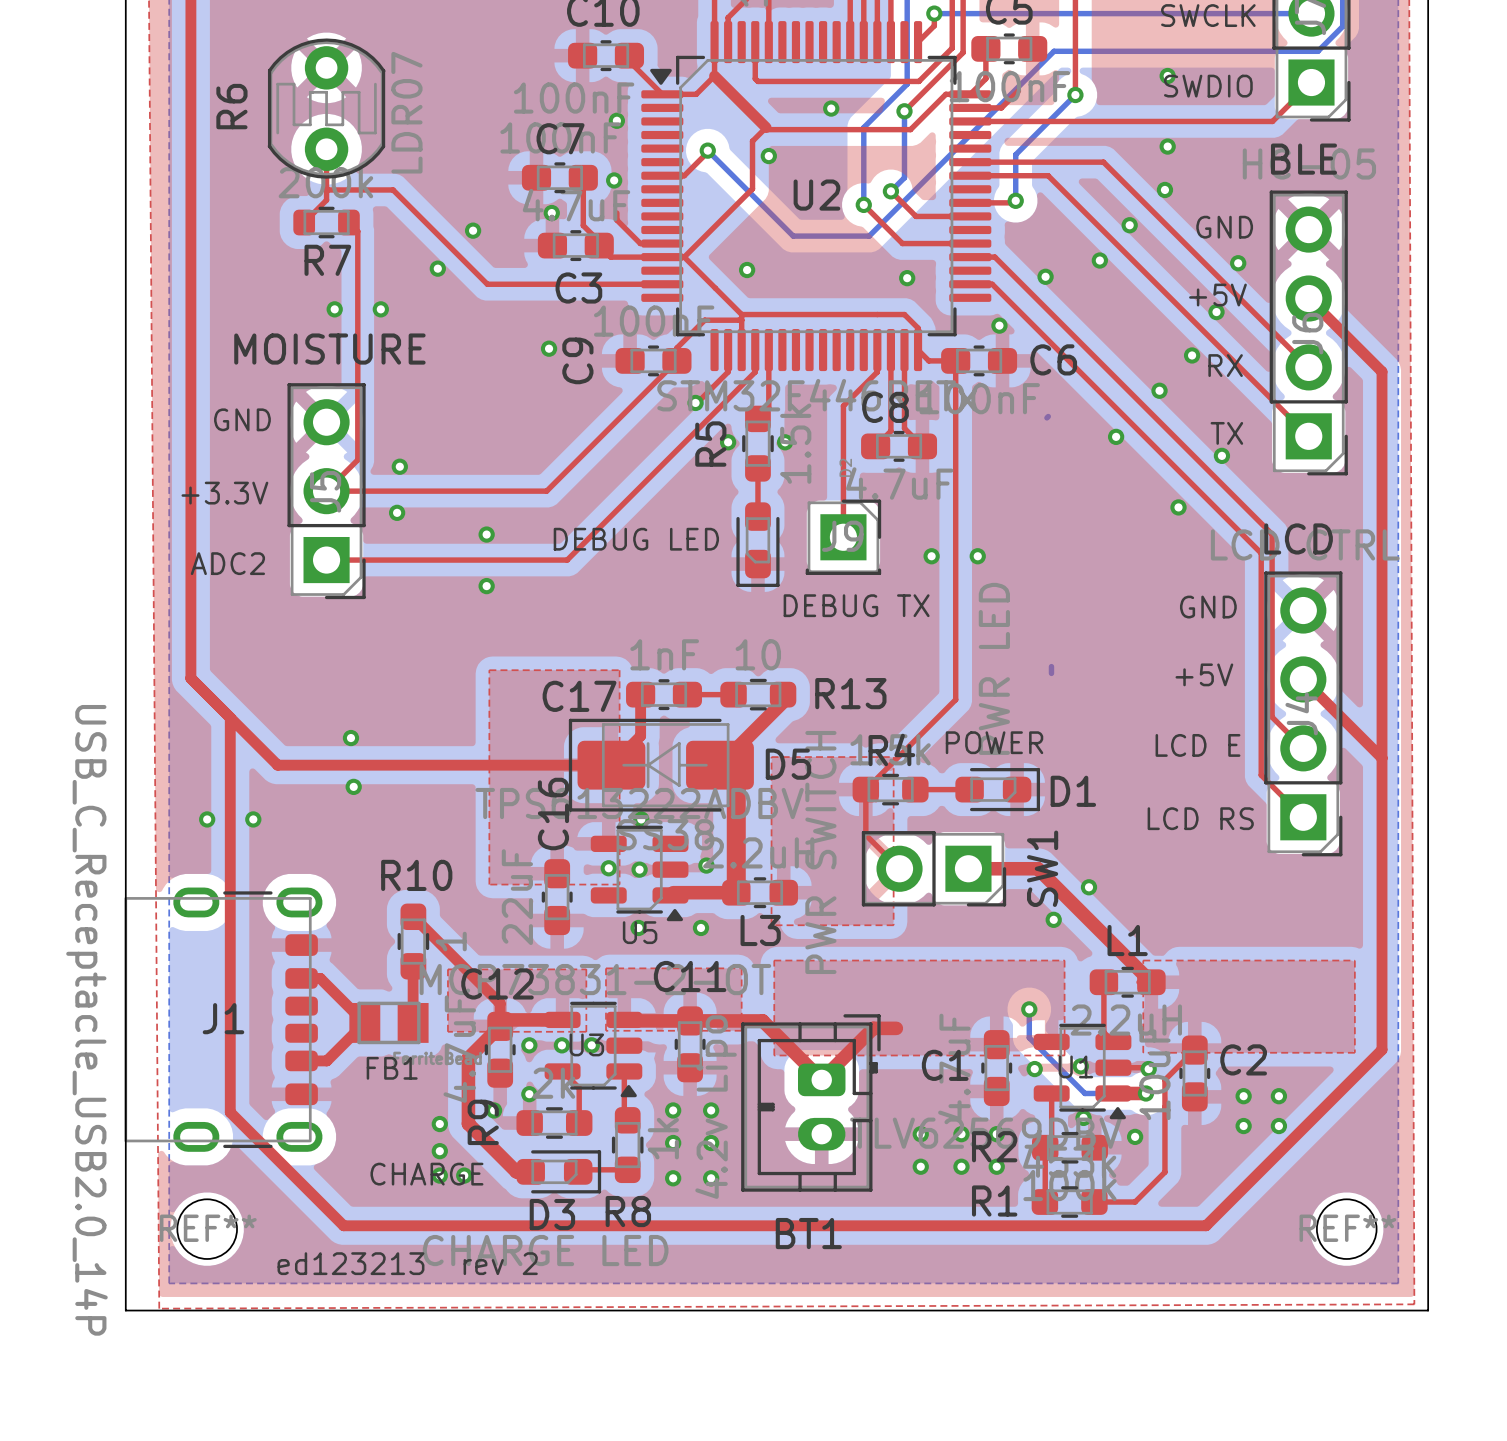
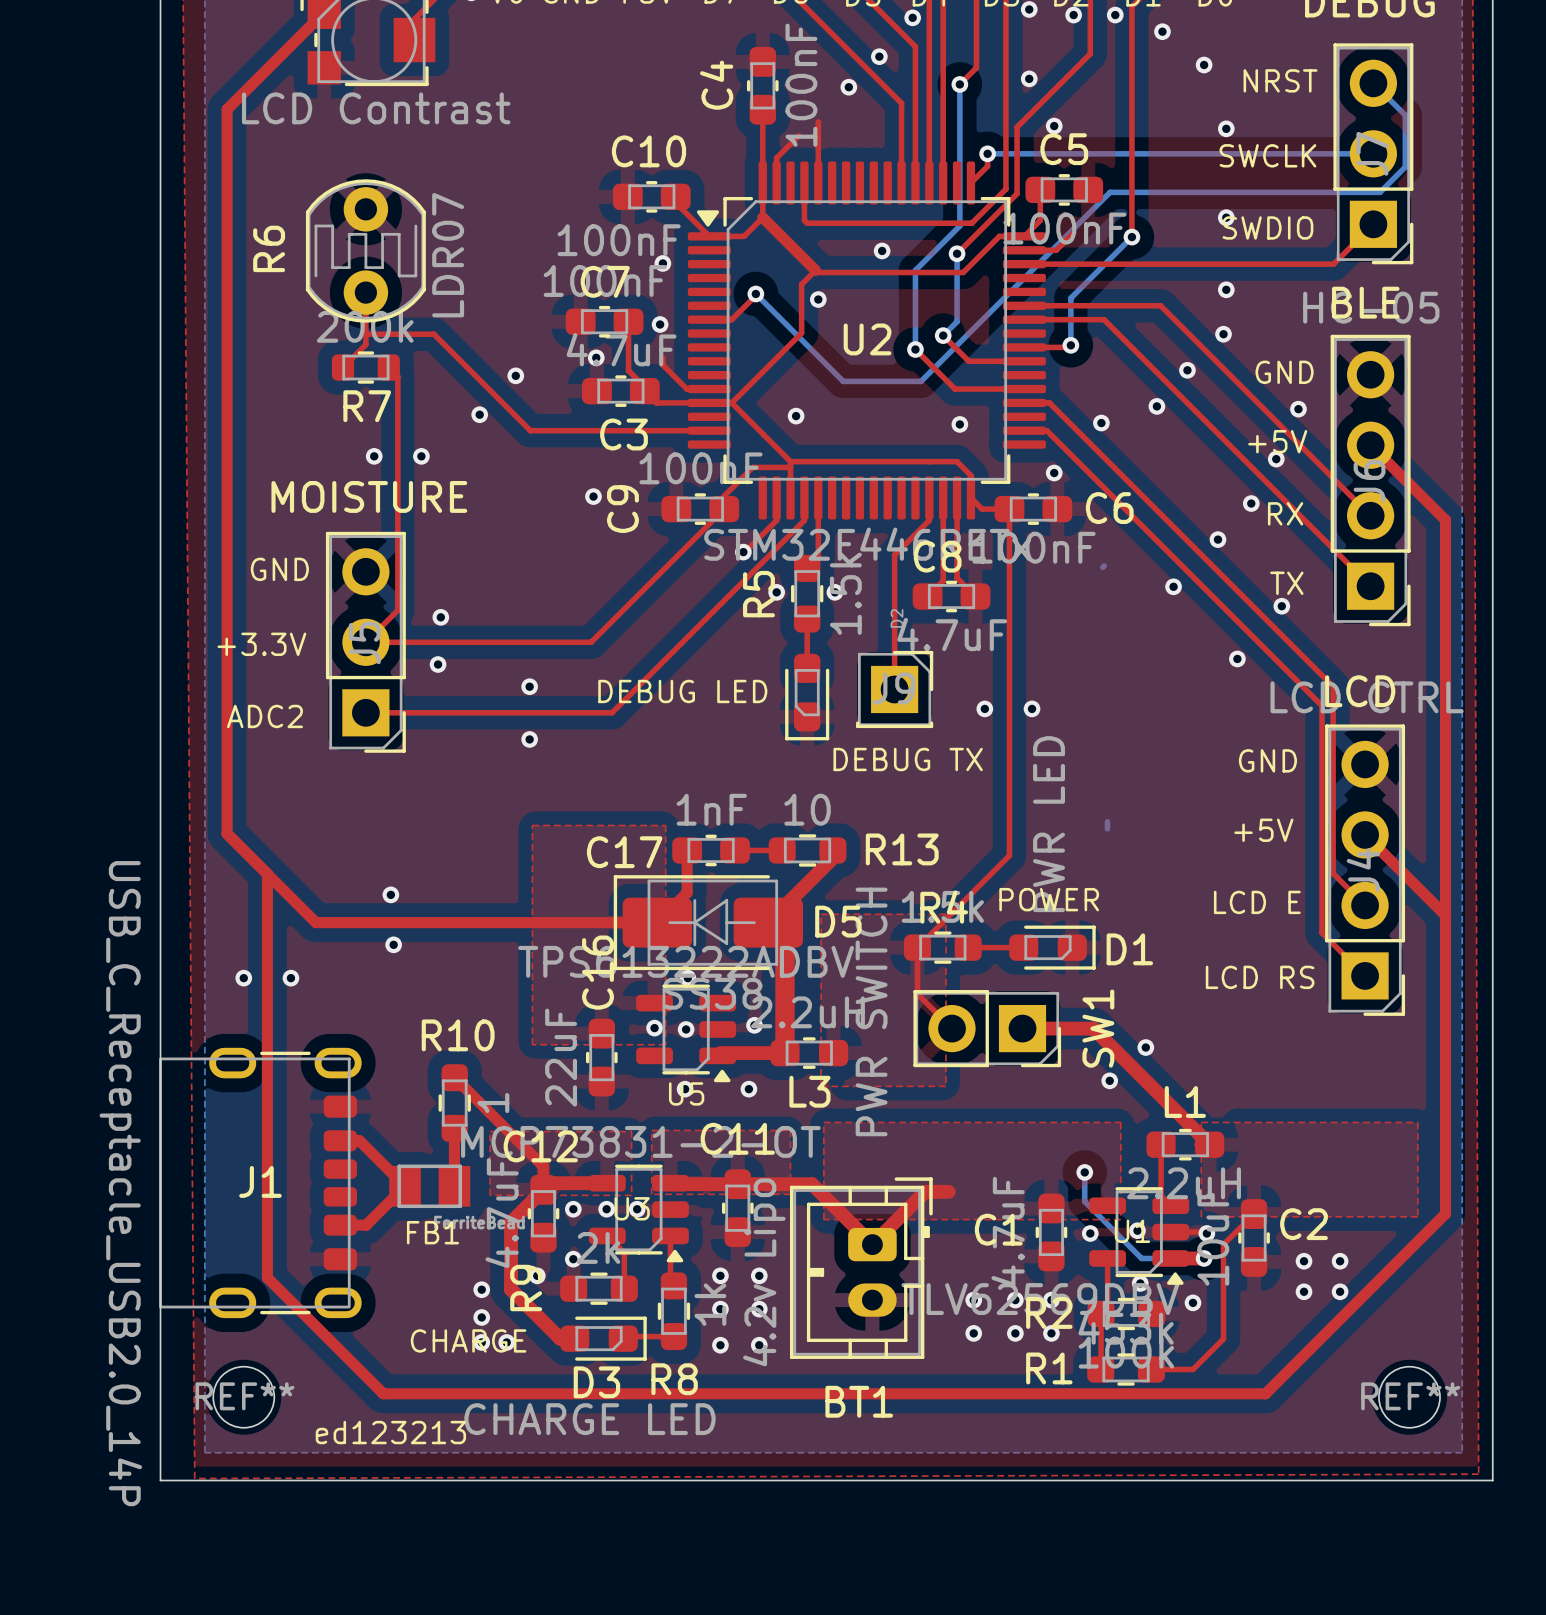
text: rev 2 (500, 1263) -> none

